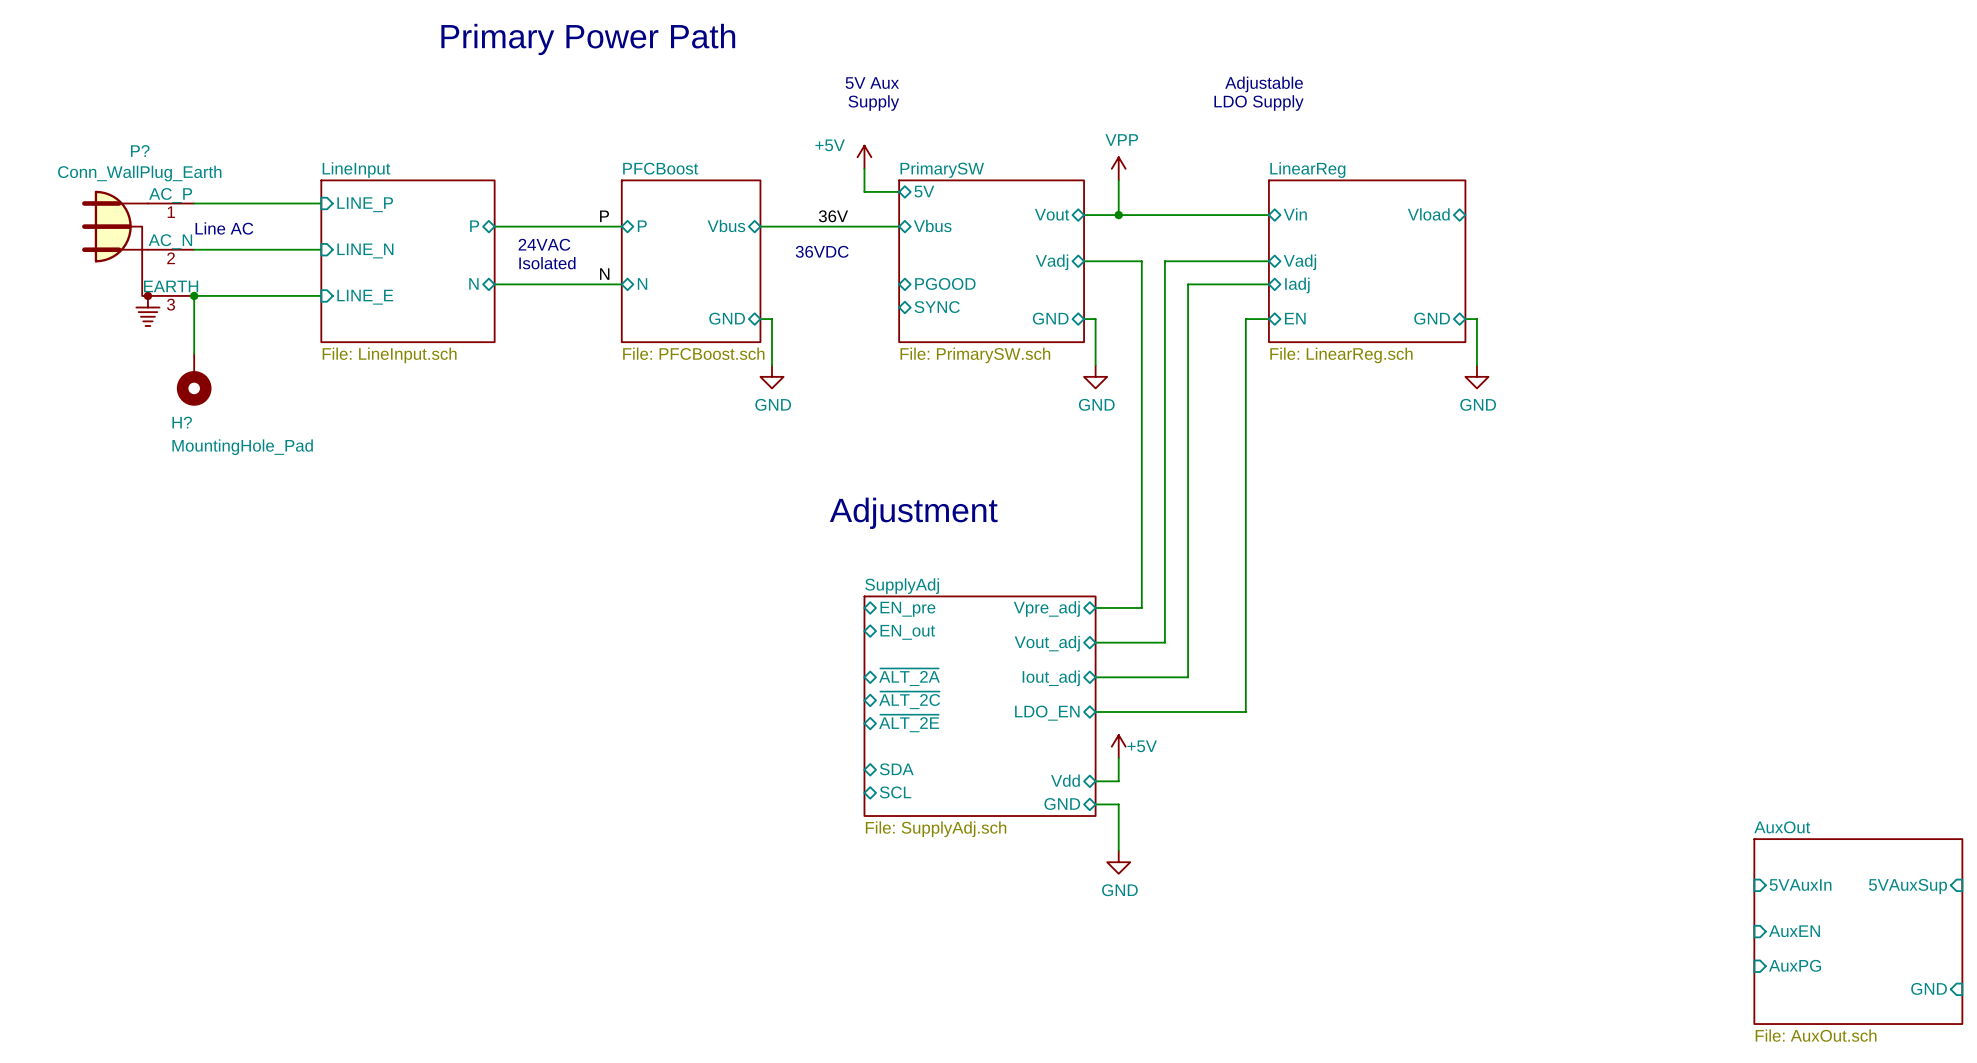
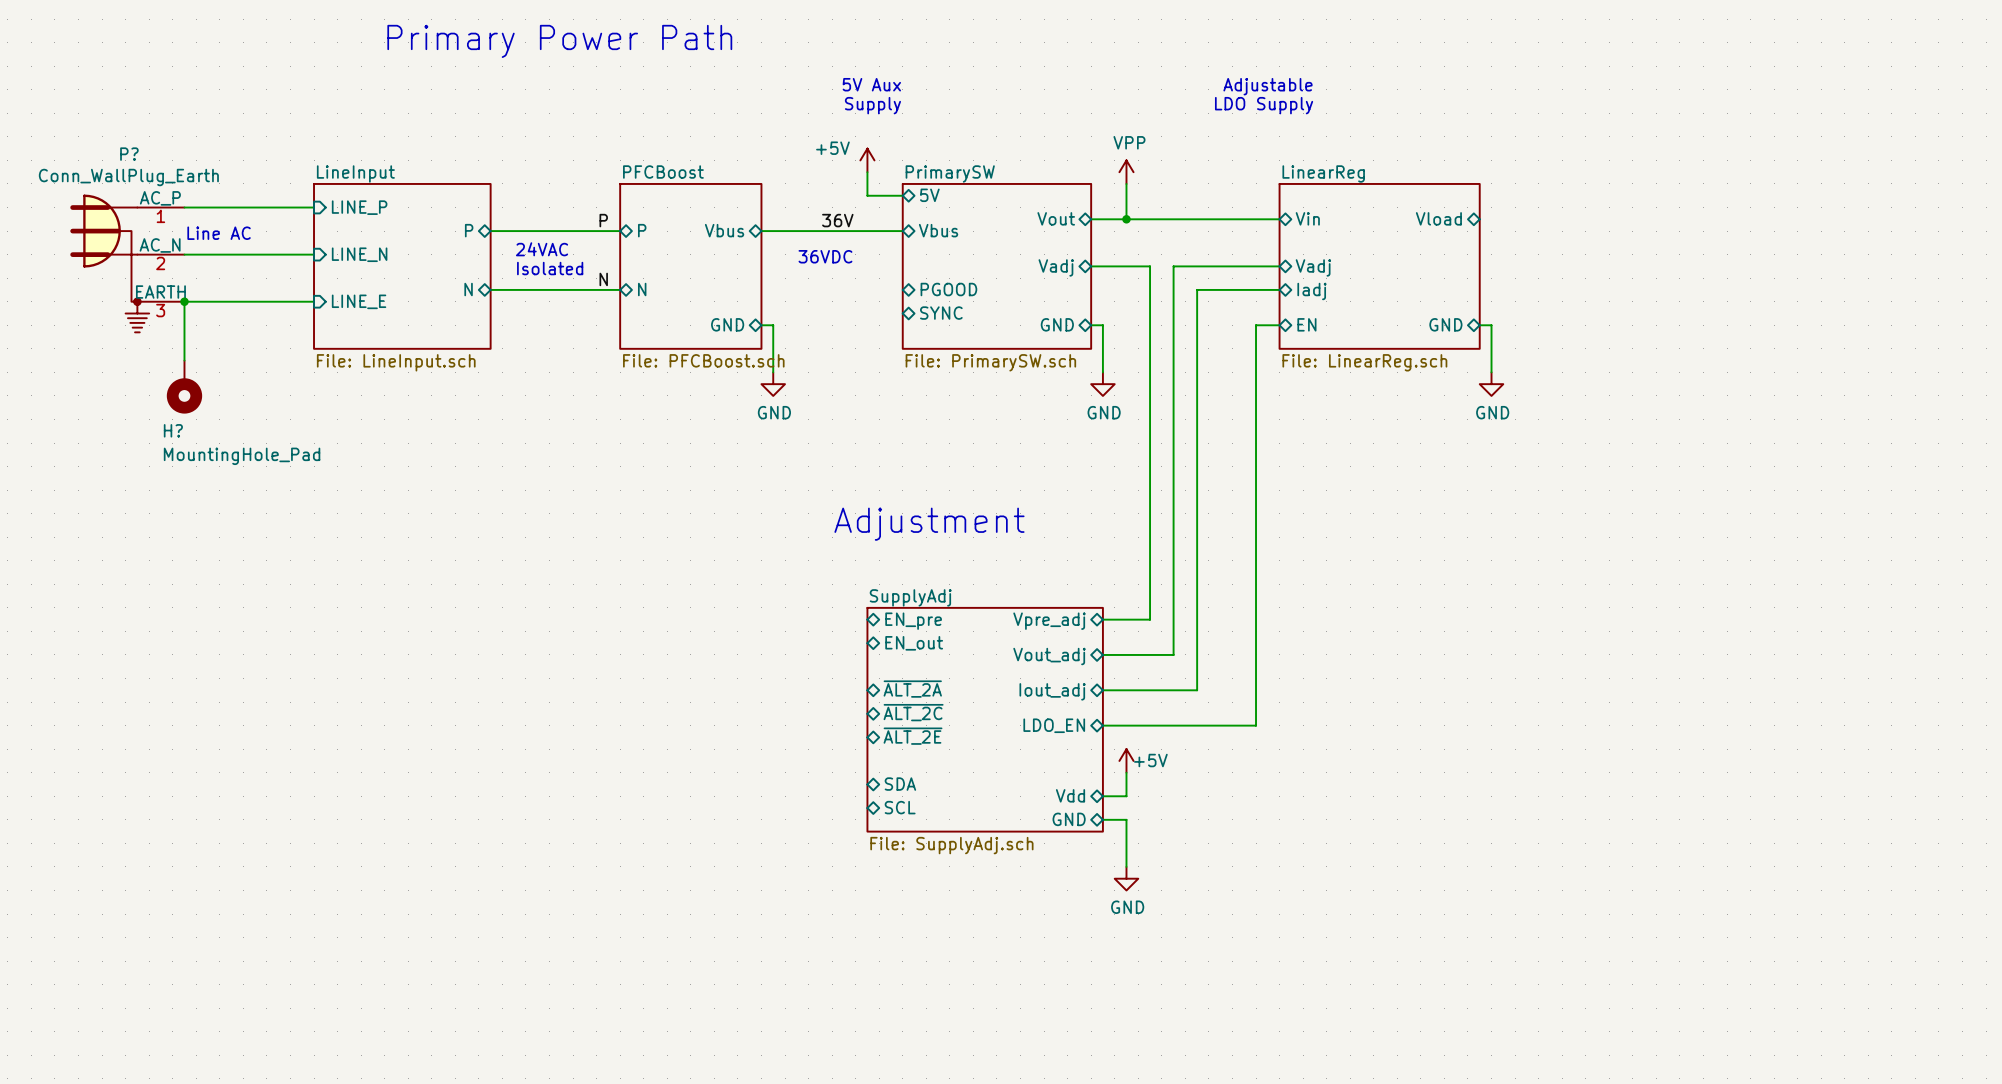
sheet pin: 5VAuxIn (1800, 885) -> none
sheet pin: 5VAuxSup (1907, 886) -> none
sheet pin: AuxEN (1794, 931) -> none
sheet AuxOut: File: AuxOut.sch (1858, 931) -> none
sheet pin: AuxPG (1795, 965) -> none
sheet pin: GND (1929, 988) -> none

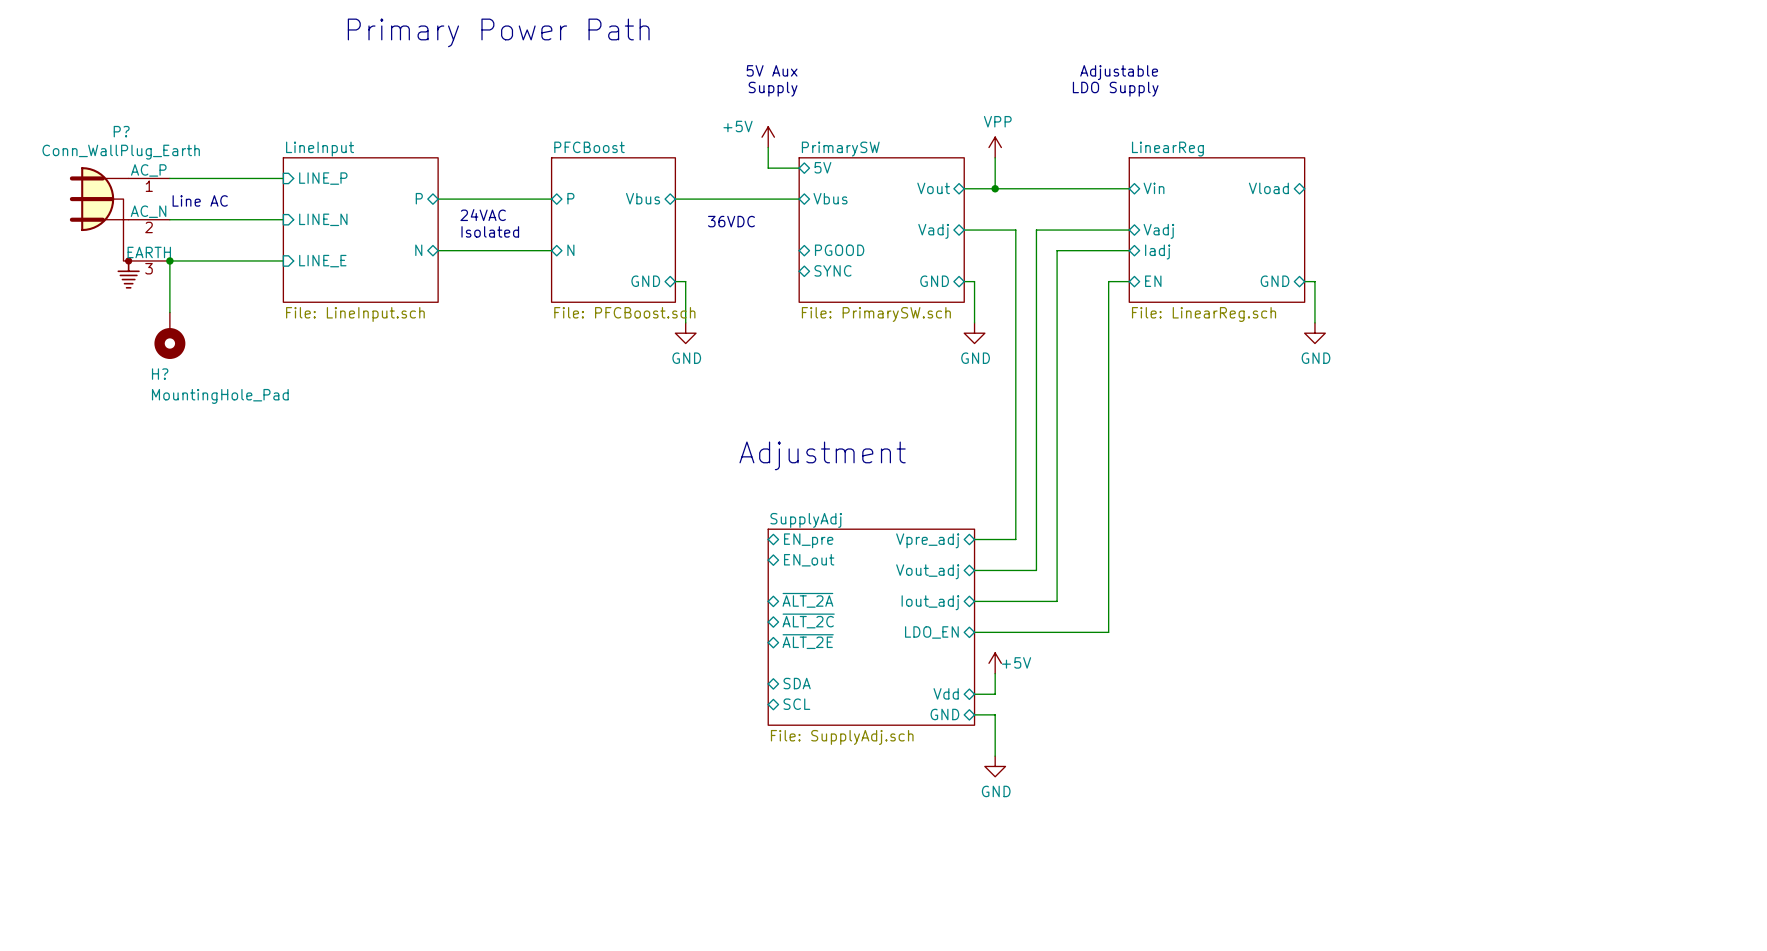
label: P (603, 220) -> none
label: 36V (837, 220) -> none
label: N (603, 279) -> none

